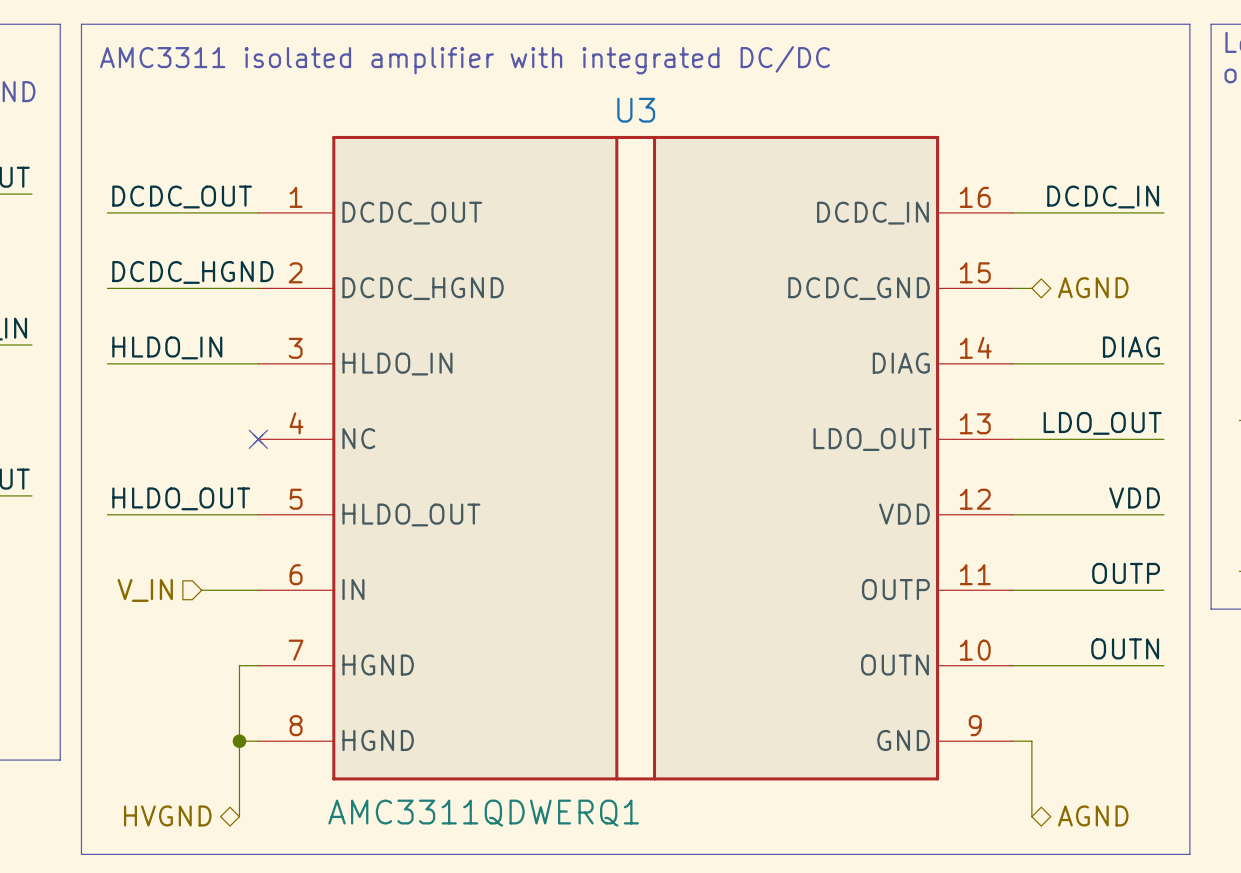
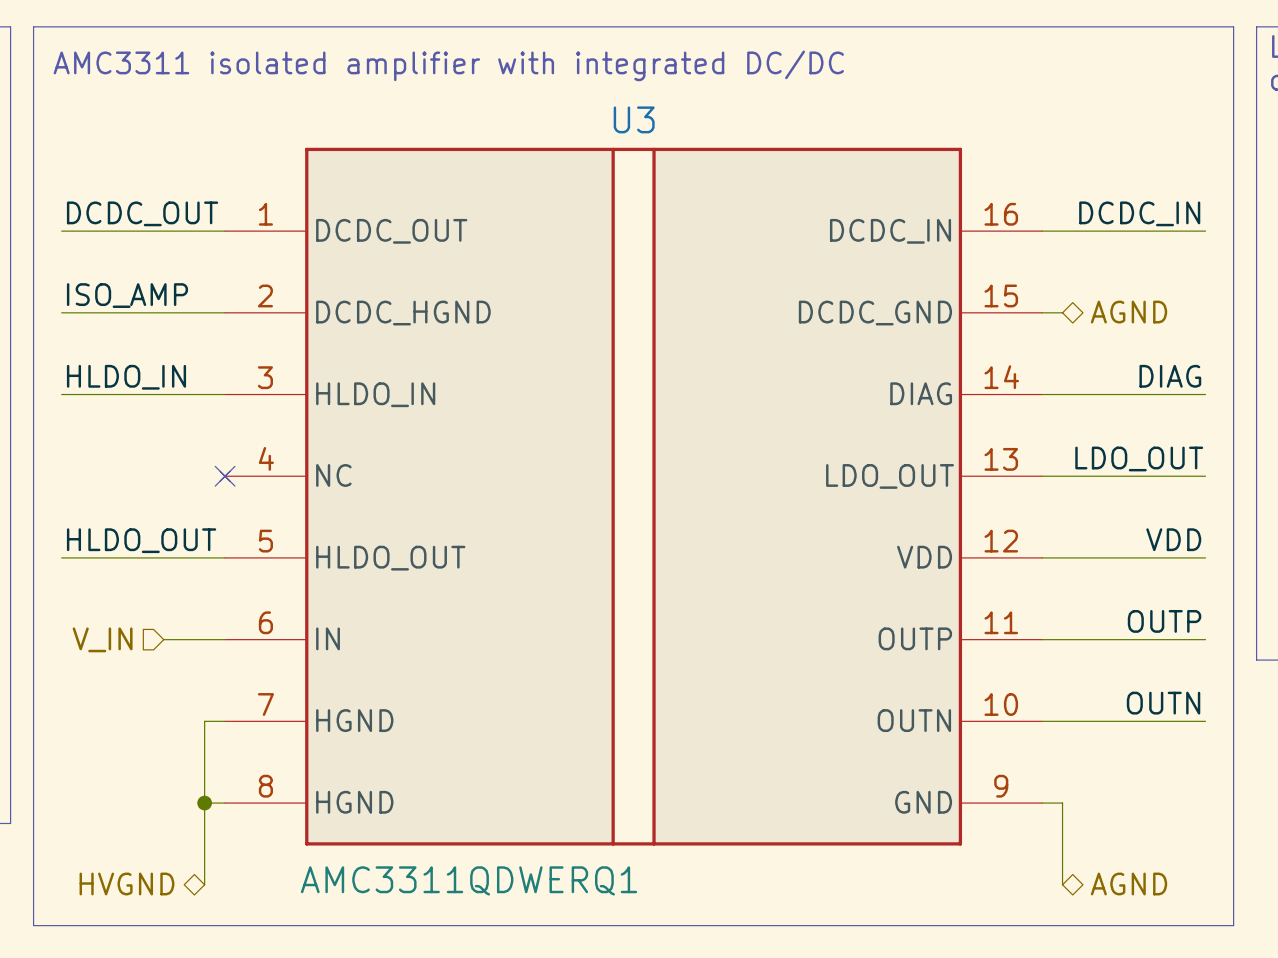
label: DCDC_HGND (192, 272) -> ISO_AMP (127, 295)

